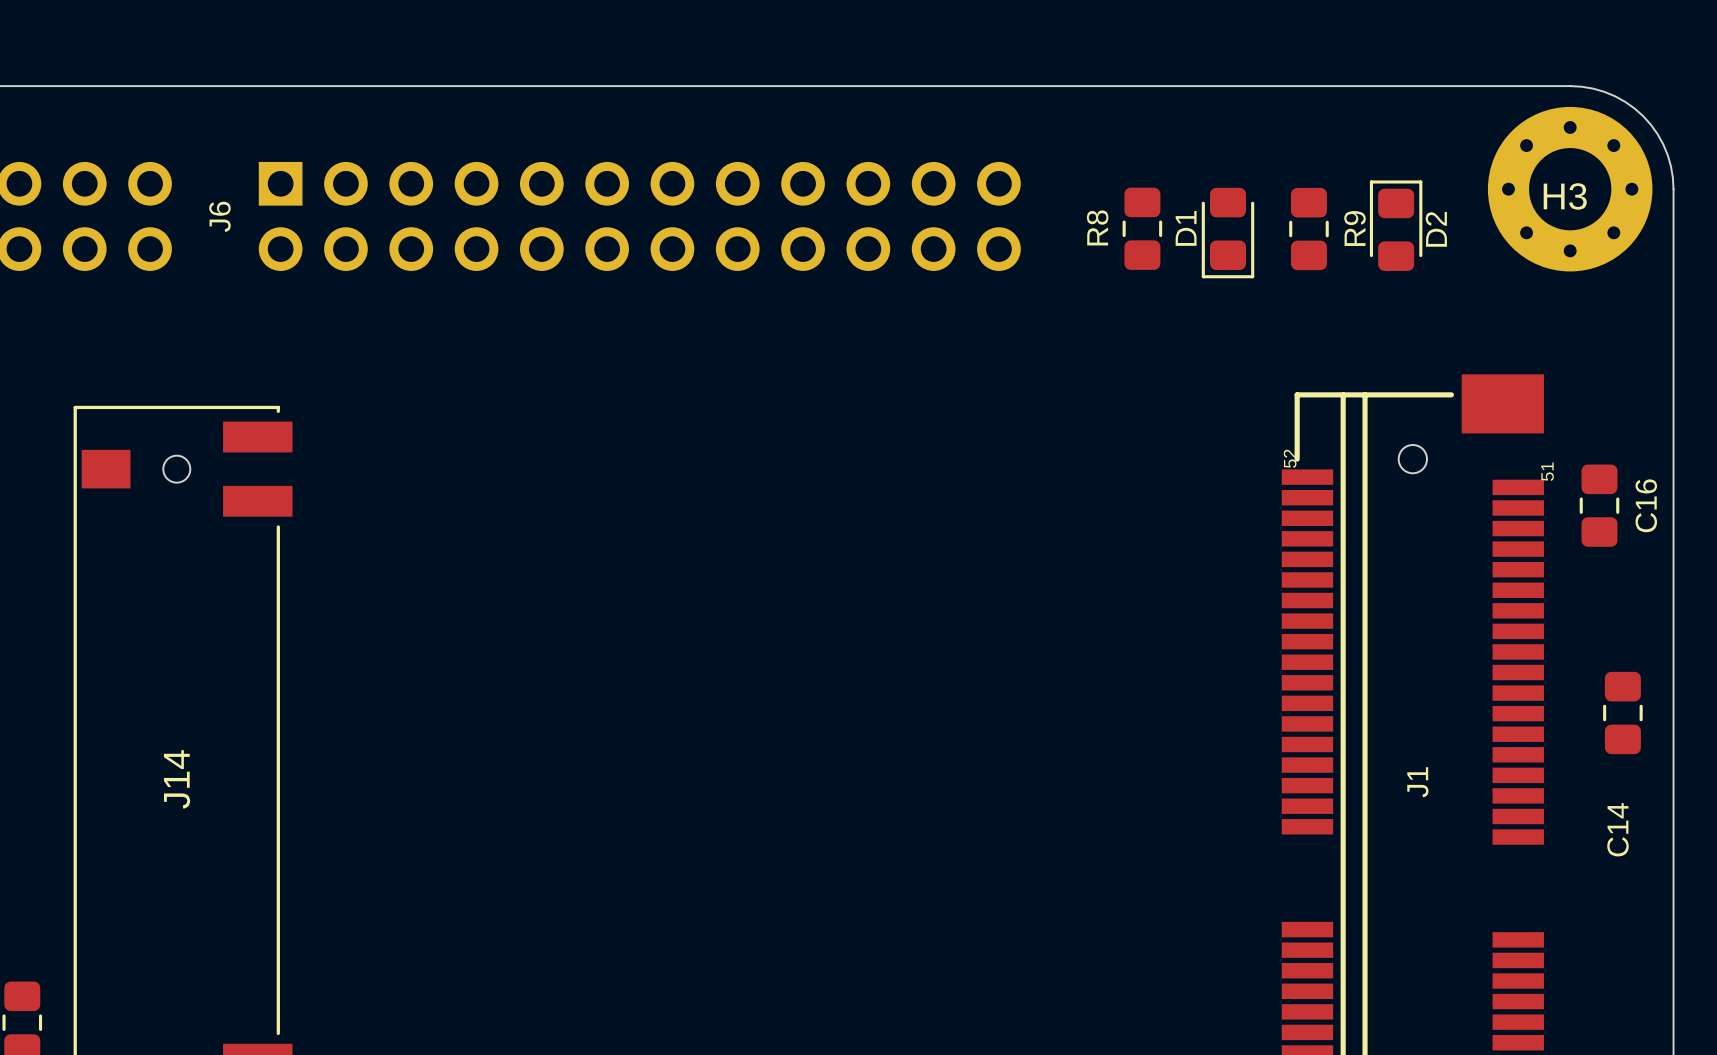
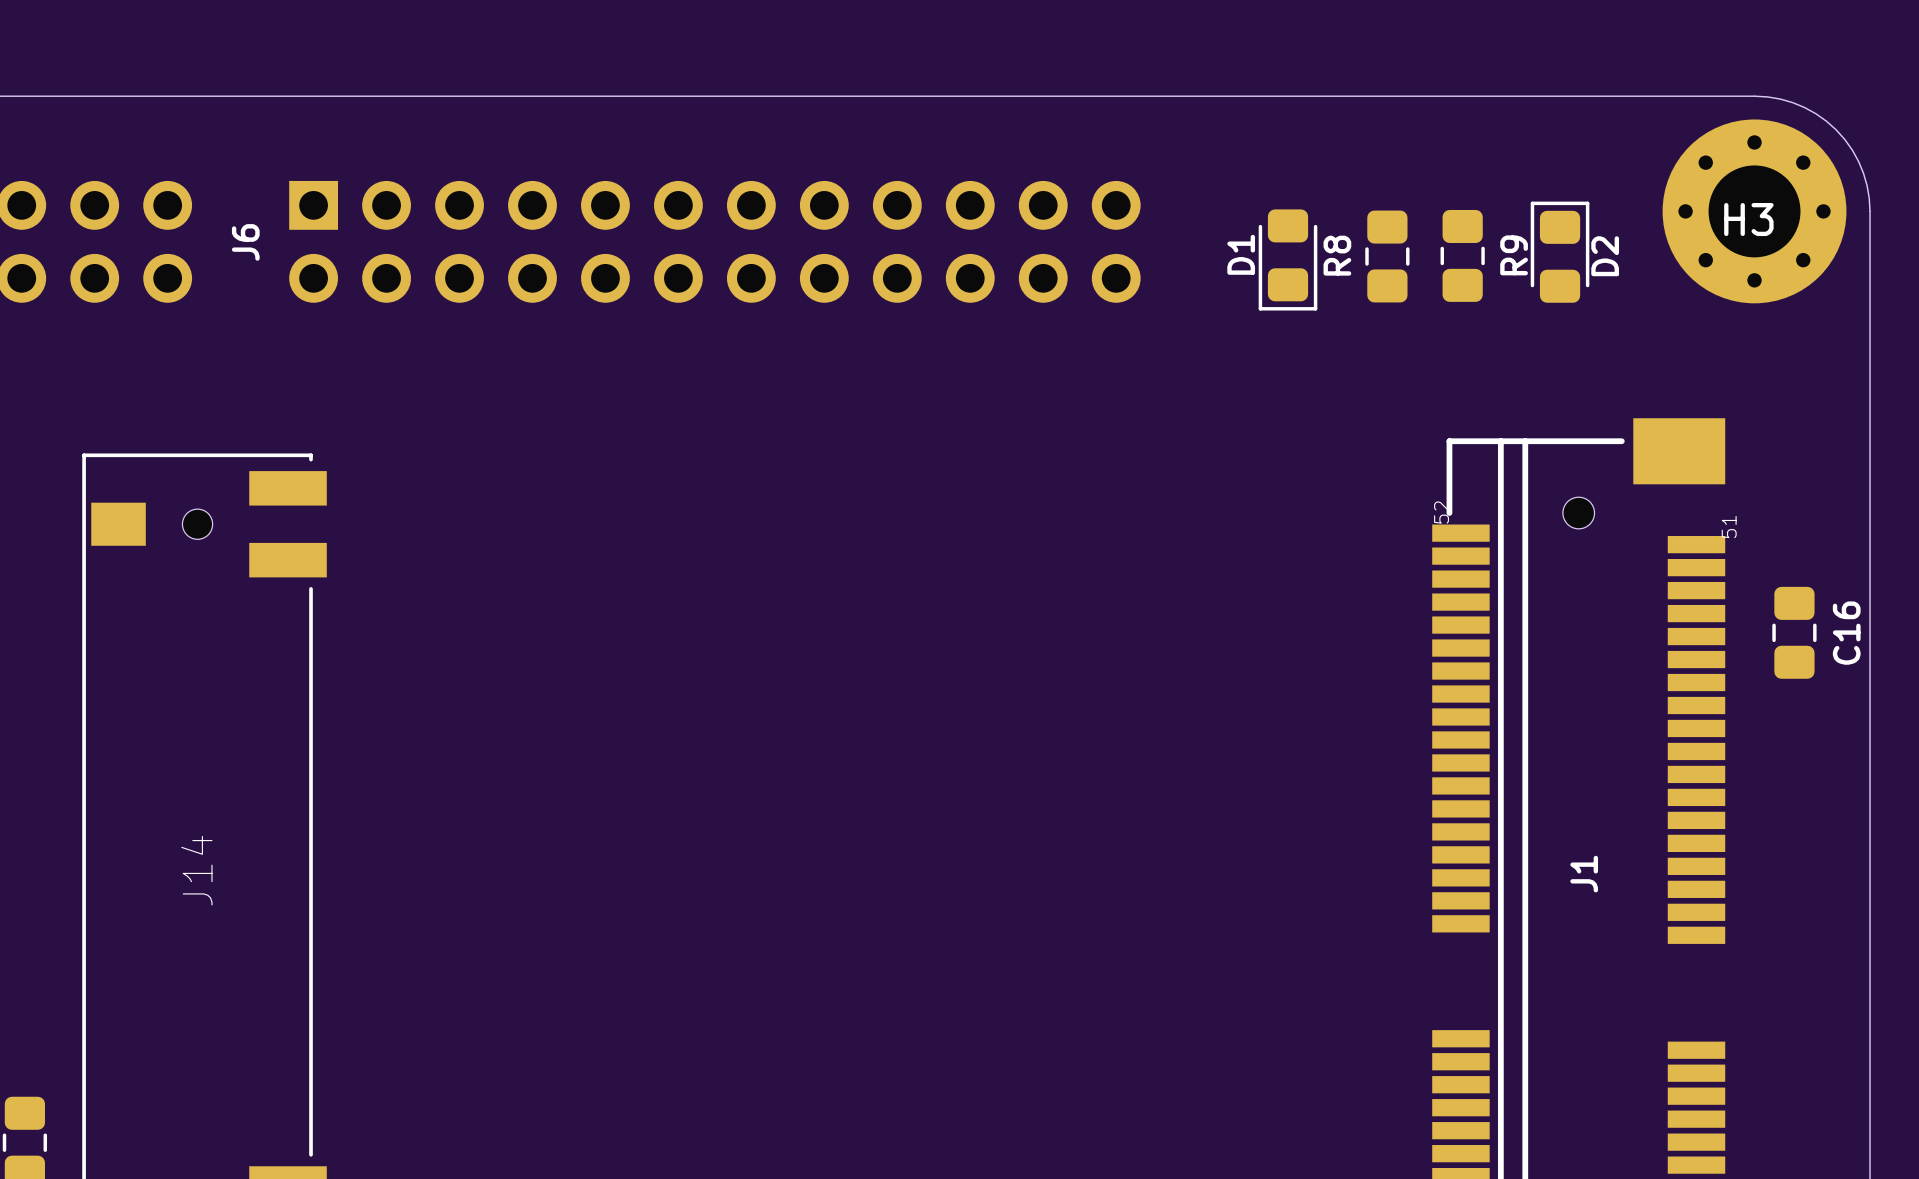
R8 position: (1142, 228) -> (1387, 256)
D1 position: (1228, 233) -> (1288, 259)
C16 position: (1599, 505) -> (1794, 632)
C14: (1622, 713) -> none

